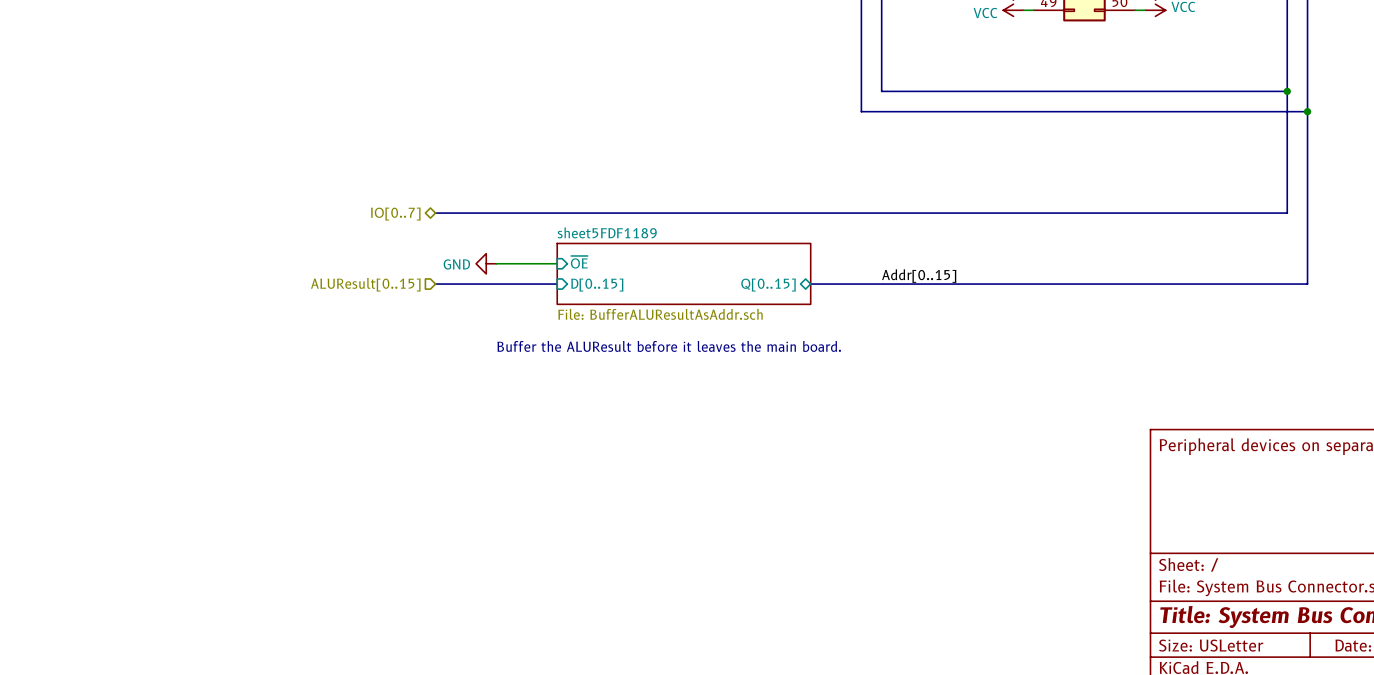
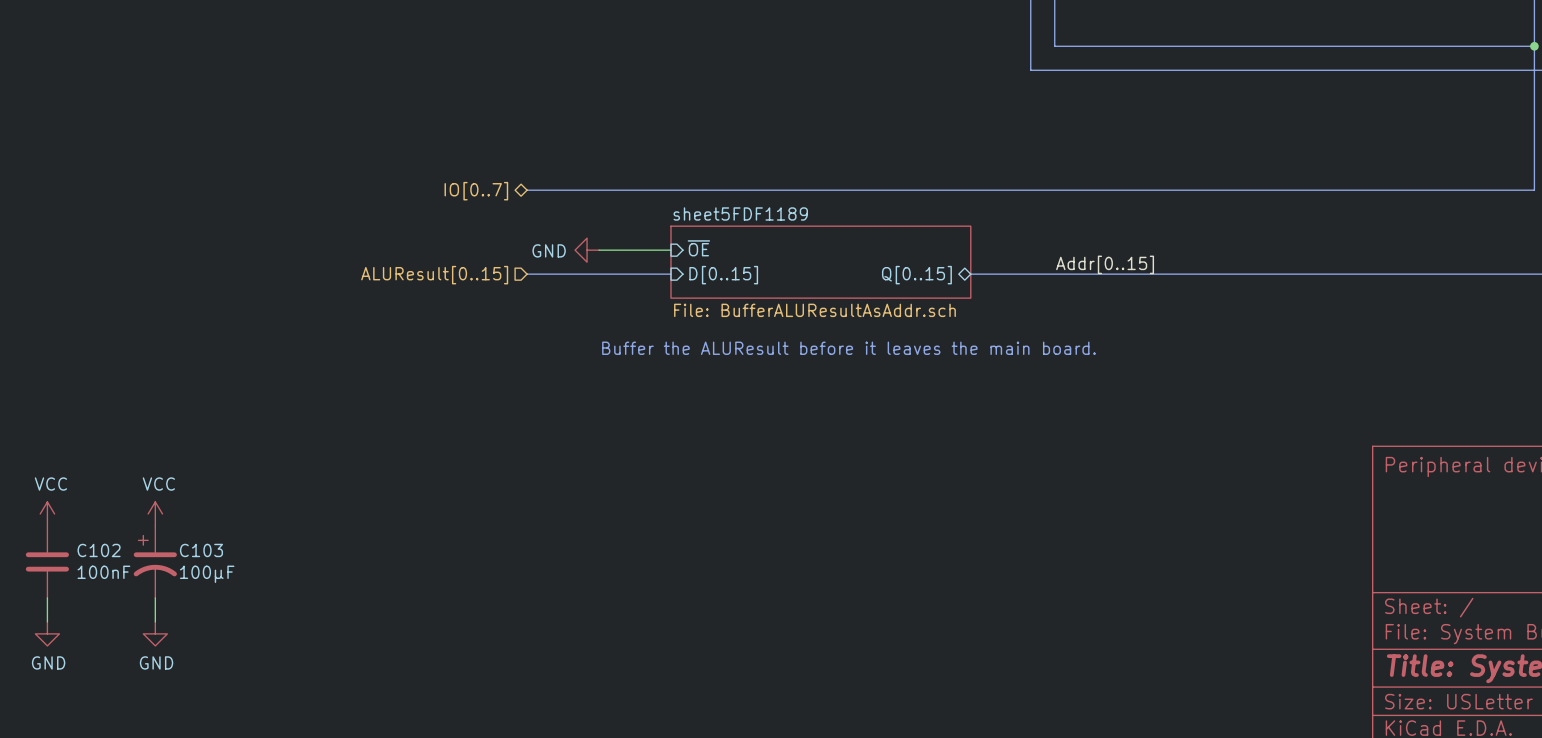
power symbol: none -> VCC (47, 513)
power symbol: none -> VCC (155, 513)
C102: none -> 100nF (47, 561)
C103: none -> 100µF (155, 561)
wire: none -> (47, 597) (47, 621)
wire: none -> (155, 597) (155, 621)
power symbol: none -> GND (47, 633)
power symbol: none -> GND (155, 633)

